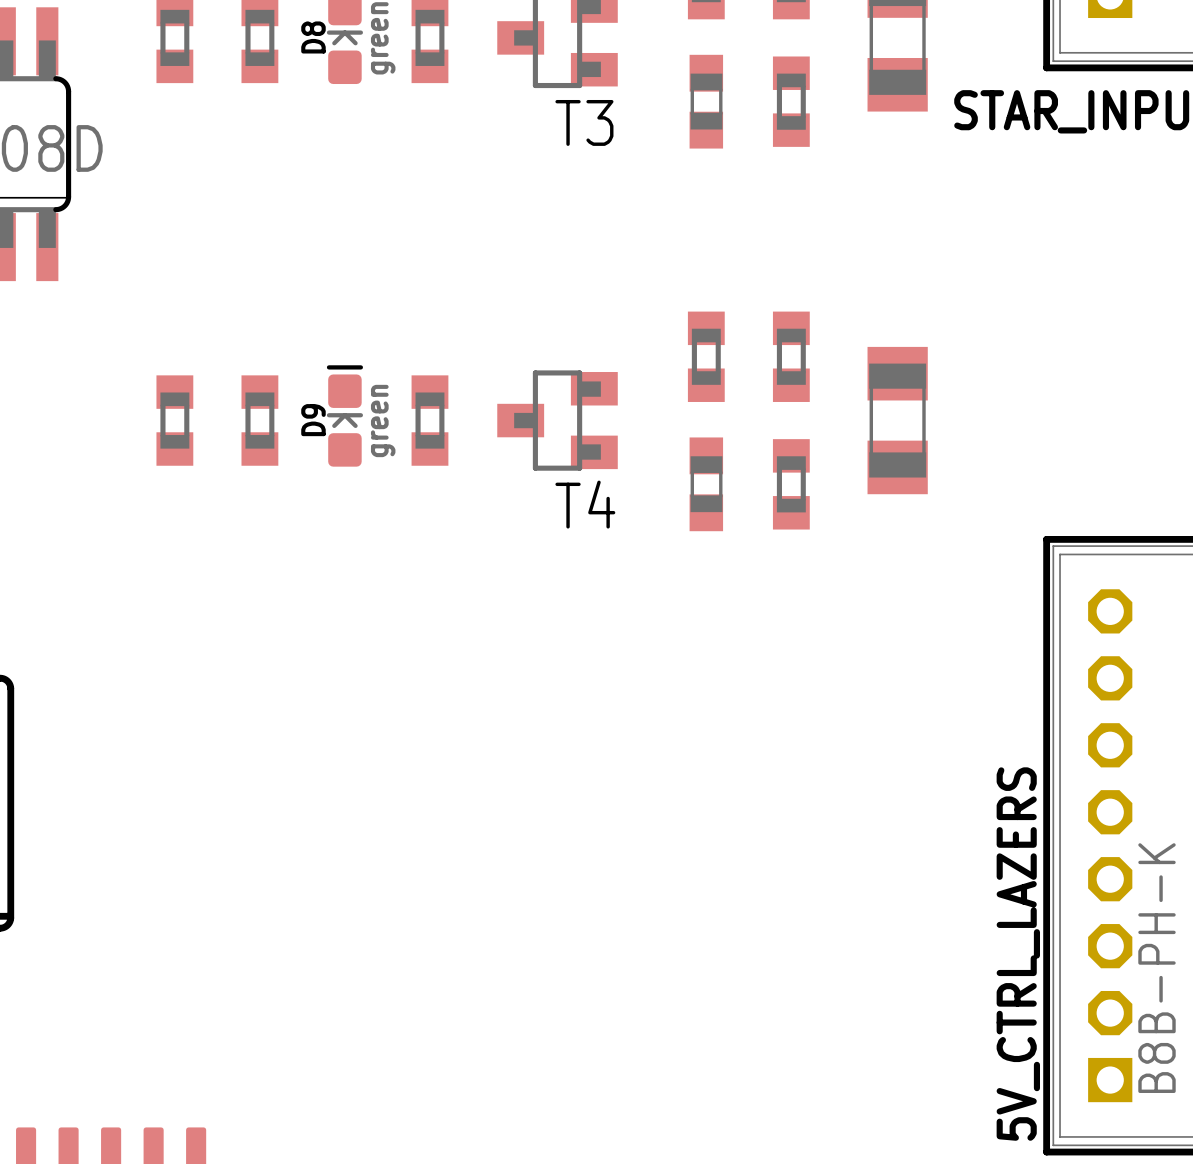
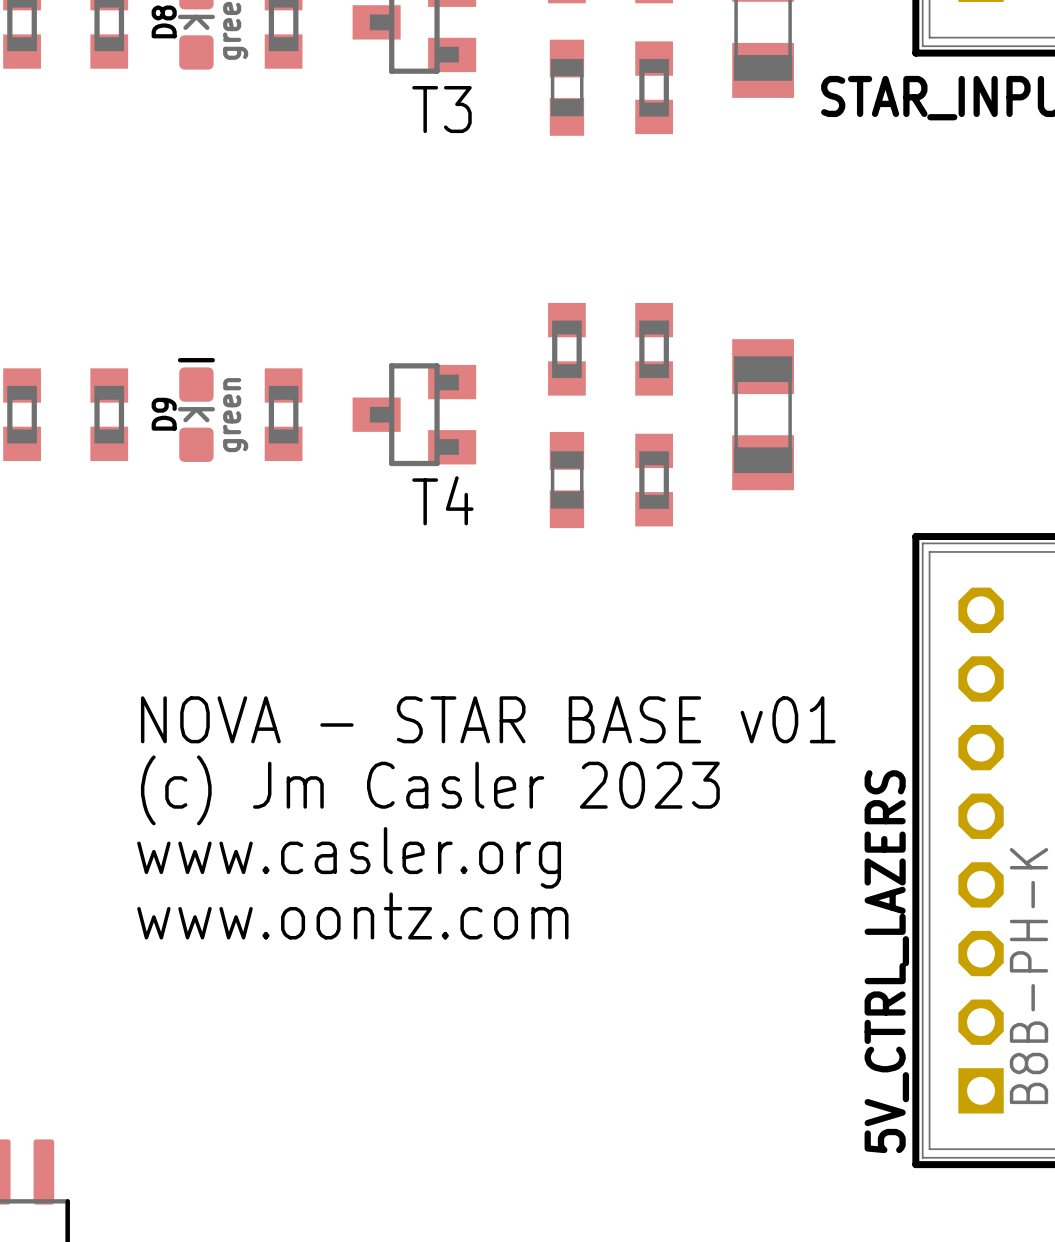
text: none -> NOVA - STAR BASE v01 (488, 719)
text: none -> (c) Jm Casler 2023 (430, 790)
text: none -> www.casler.org (349, 857)
text: none -> www.oontz.com (352, 915)

